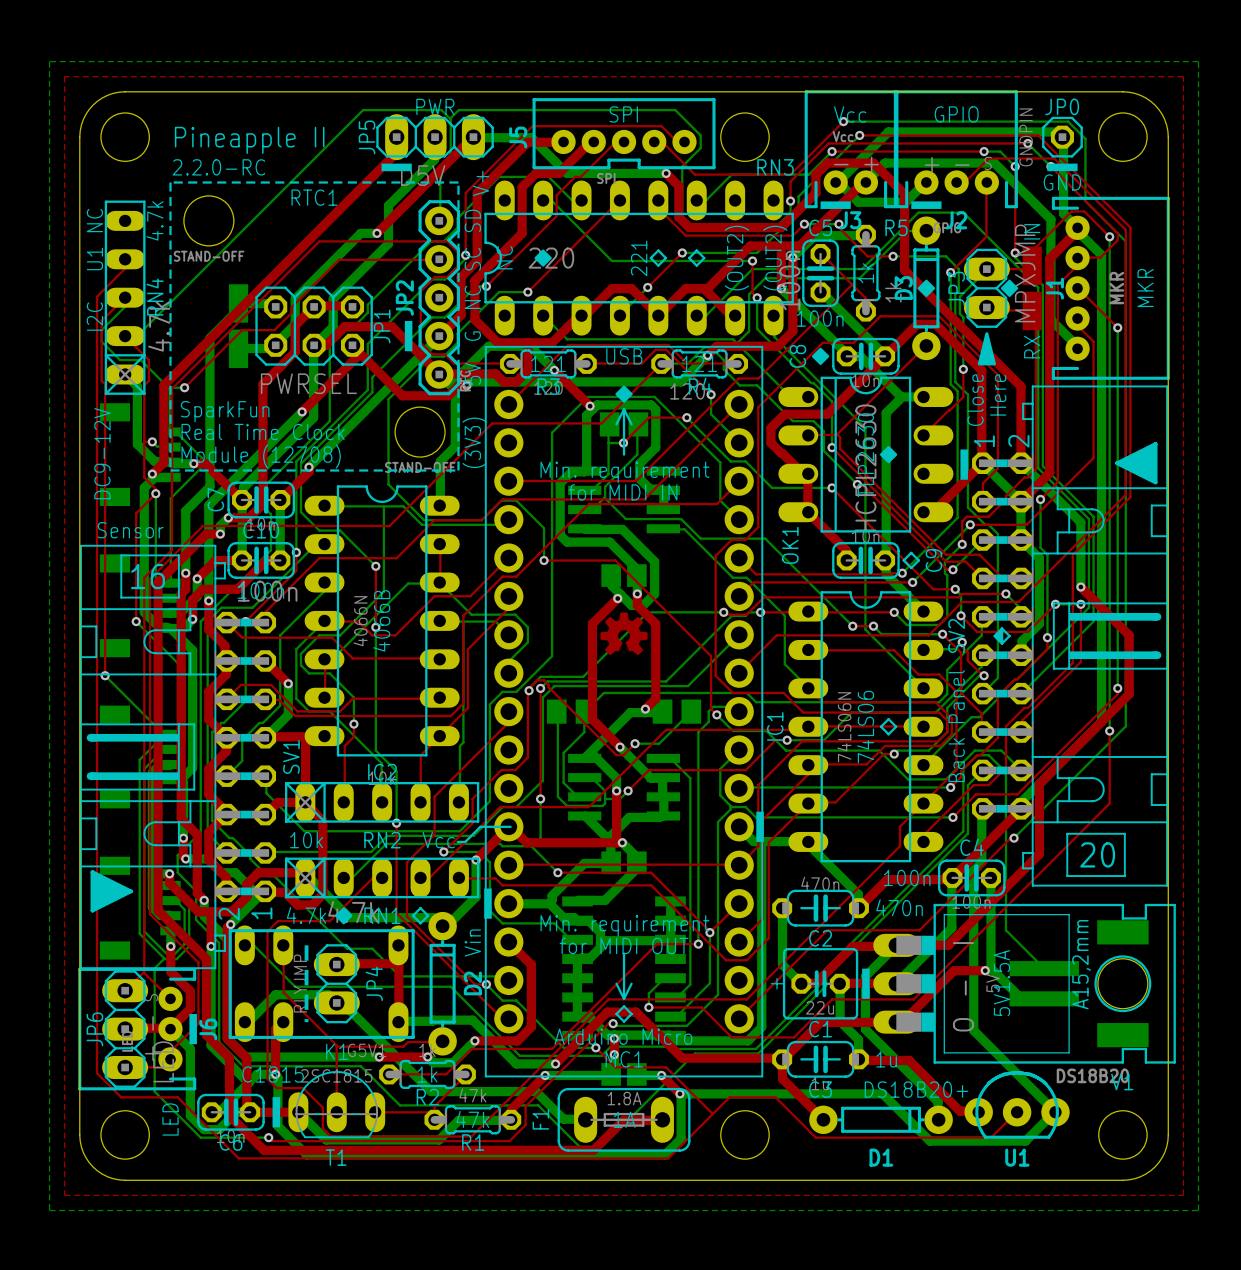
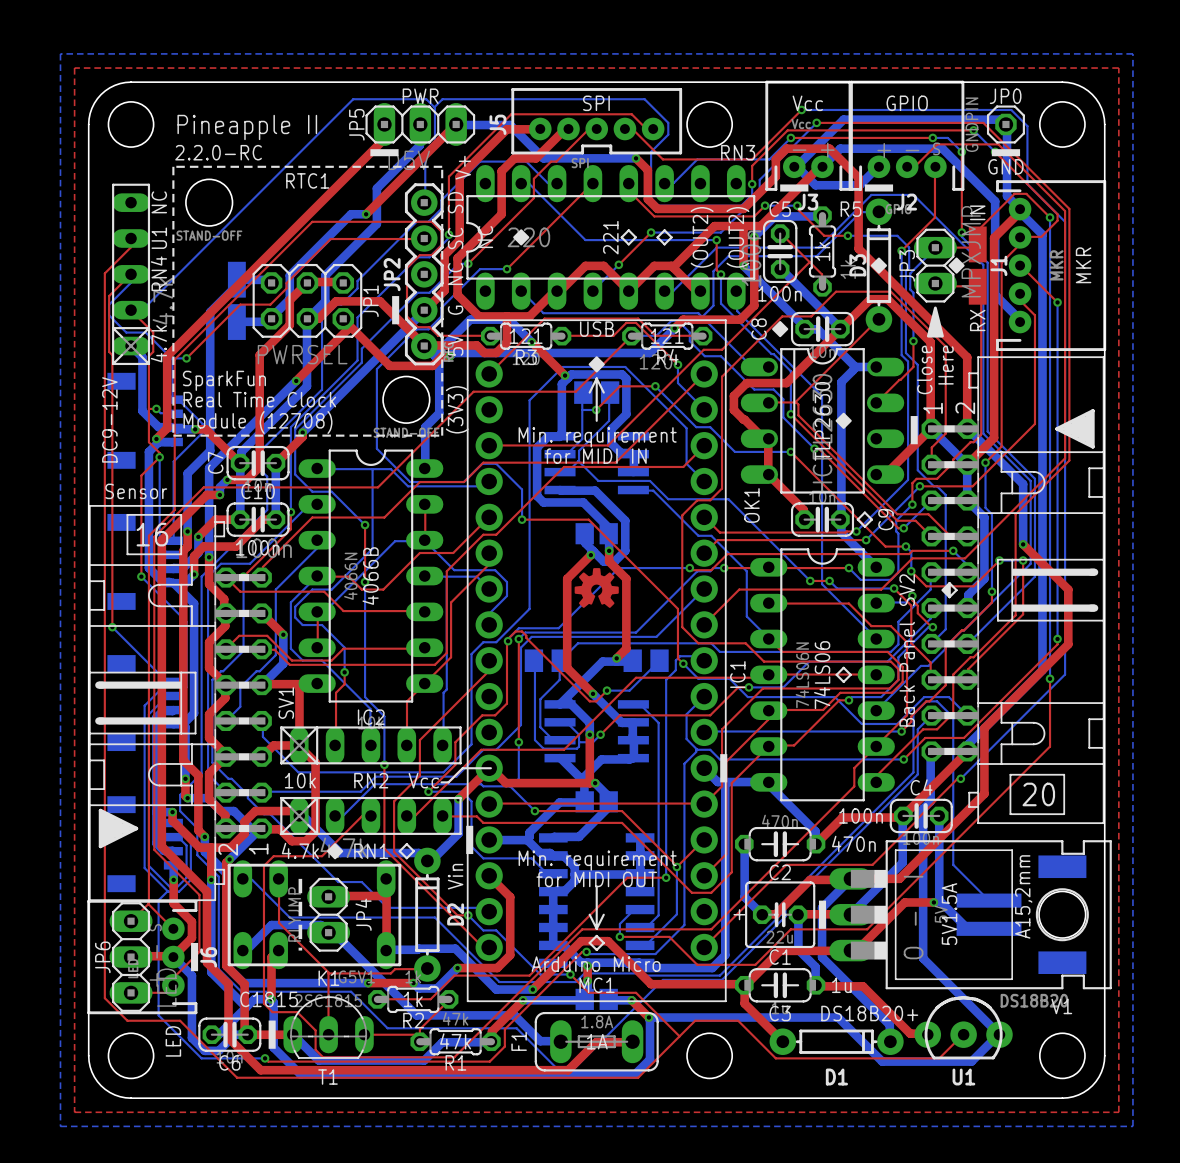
text: NC (94, 220) -> none
text: 4.7k (155, 220) -> NC (159, 202)
text position: U1 (94, 258) -> U1 (159, 238)
text: I2C (94, 316) -> none
text: none -> 4.7k (158, 343)

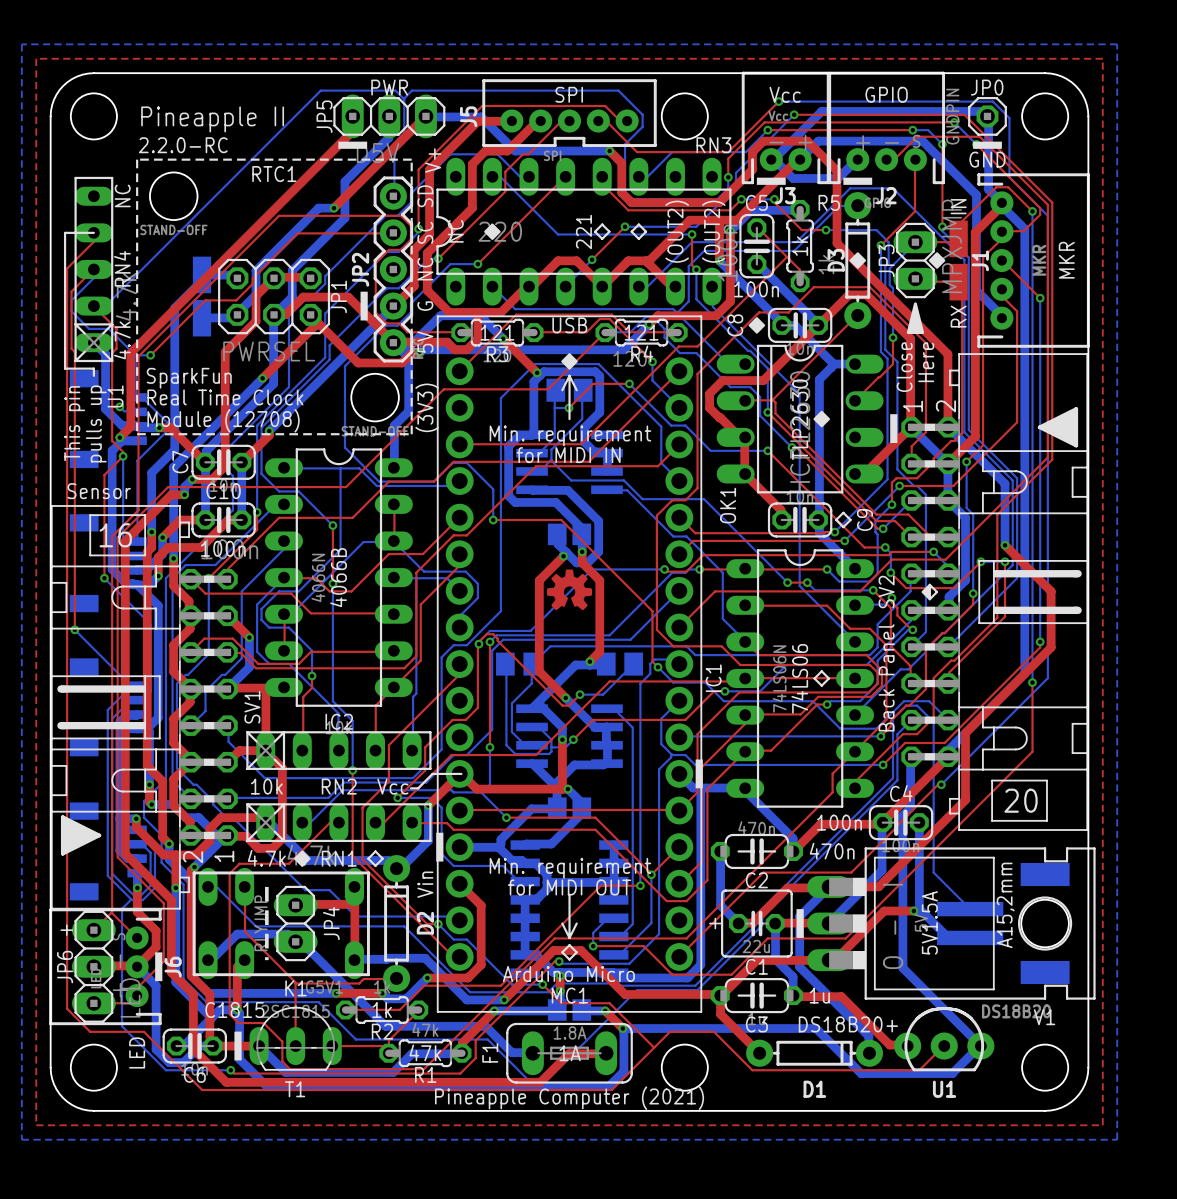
line: none -> (93, 232) (65, 232) (65, 368) (93, 368) (93, 375)
text position: U1 (159, 238) -> U1 (115, 396)
text: DC9-12V (109, 419) -> none
text: none -> This pin (74, 423)
text: none -> pulls up (96, 423)
text: none -> + (66, 930)
text: none -> Pineapple Computer (2021) (569, 1098)

